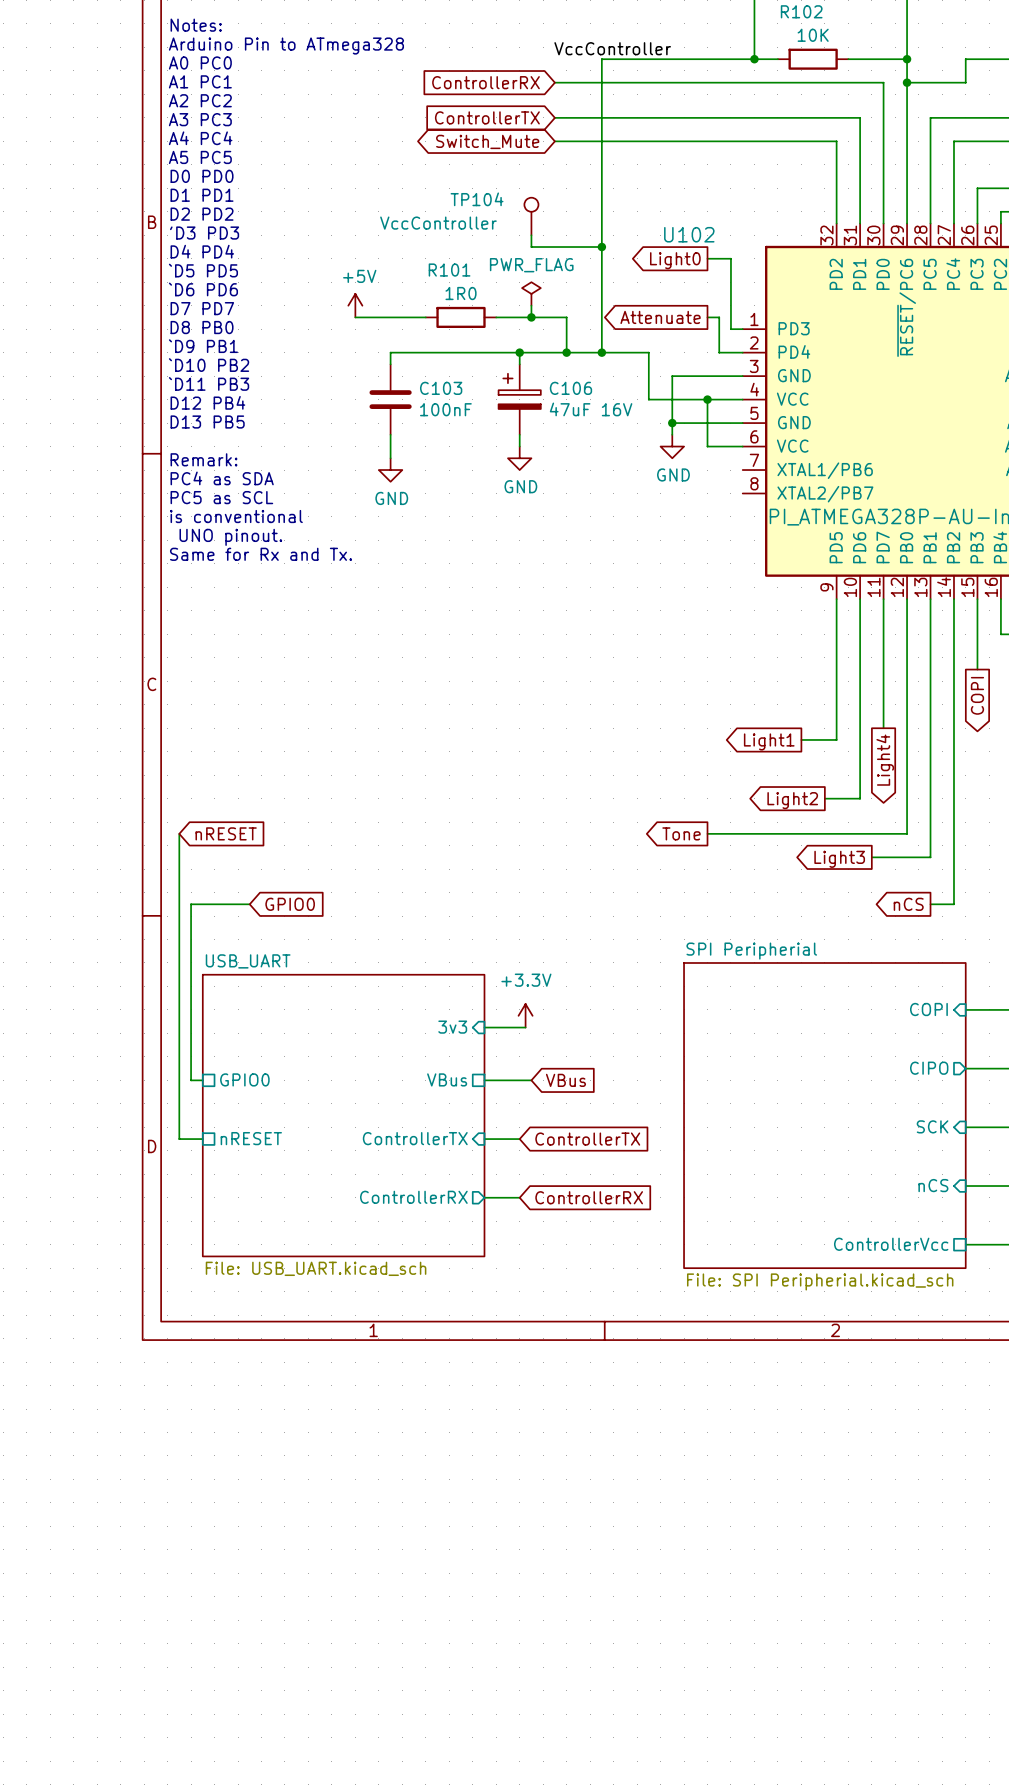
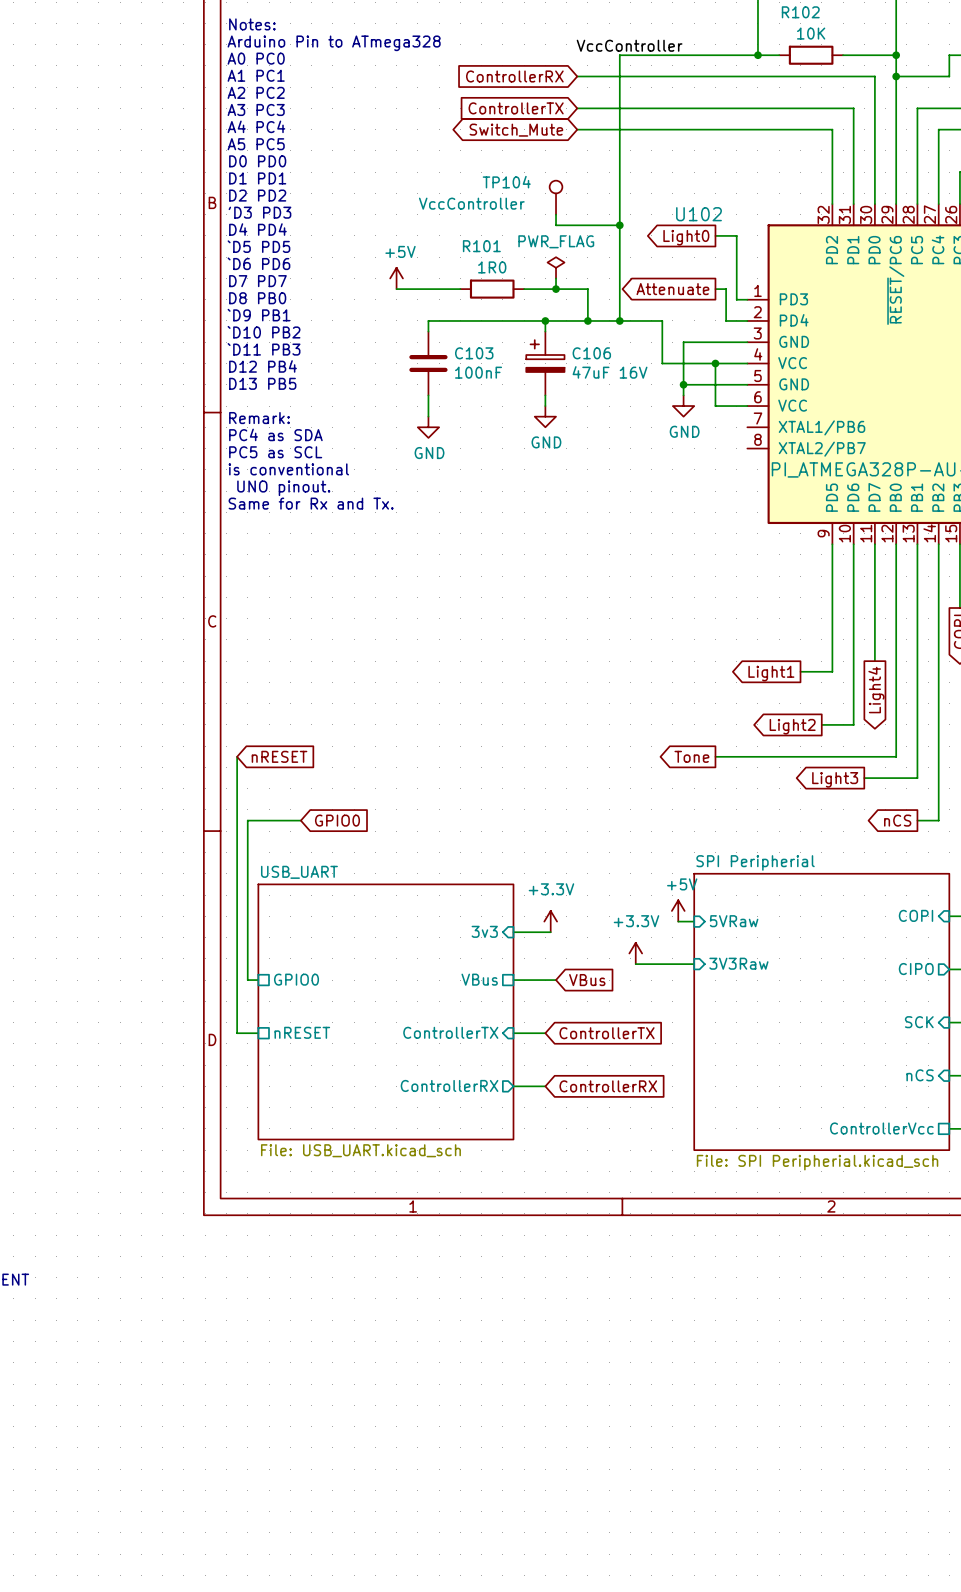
power symbol: none -> +5V (678, 910)
wire: none -> (678, 921) (694, 921)
sheet pin: none -> 5VRaw (734, 921)
power symbol: none -> +3.3V (635, 953)
wire: none -> (635, 964) (694, 964)
sheet pin: none -> 3V3Raw (738, 963)

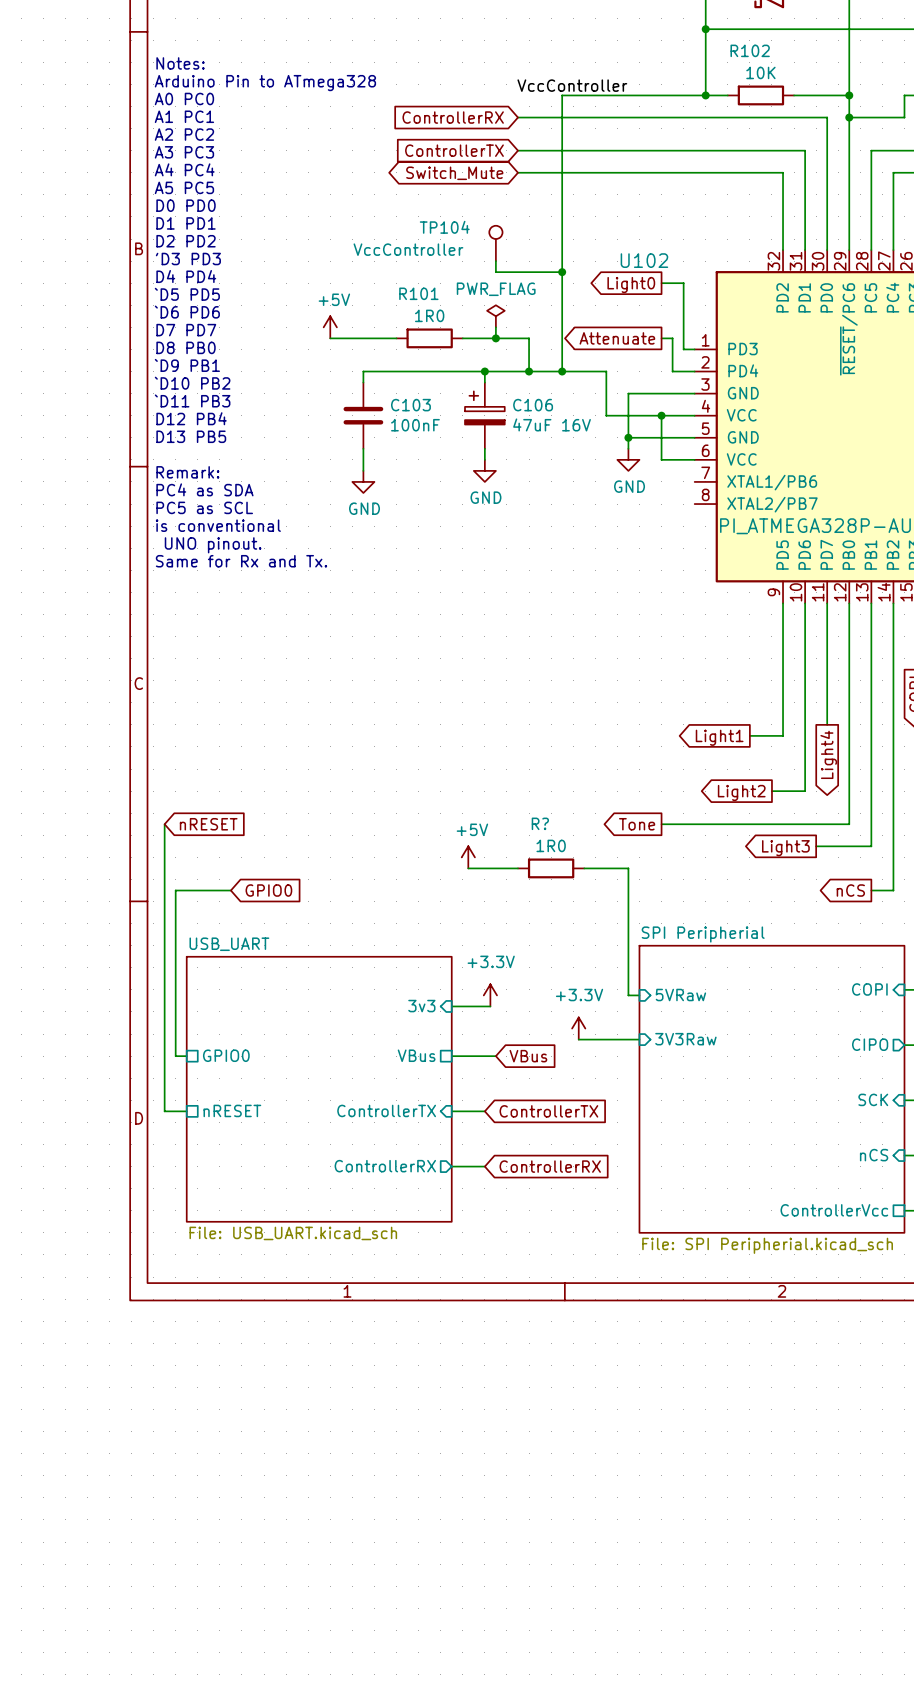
wire: none -> (468, 868) (518, 868)
R?: none -> 1R0 (551, 868)
power symbol position: +5V (678, 910) -> +5V (468, 857)
wire: (678, 921) (683, 921) -> (584, 868) (628, 868) (628, 995)

